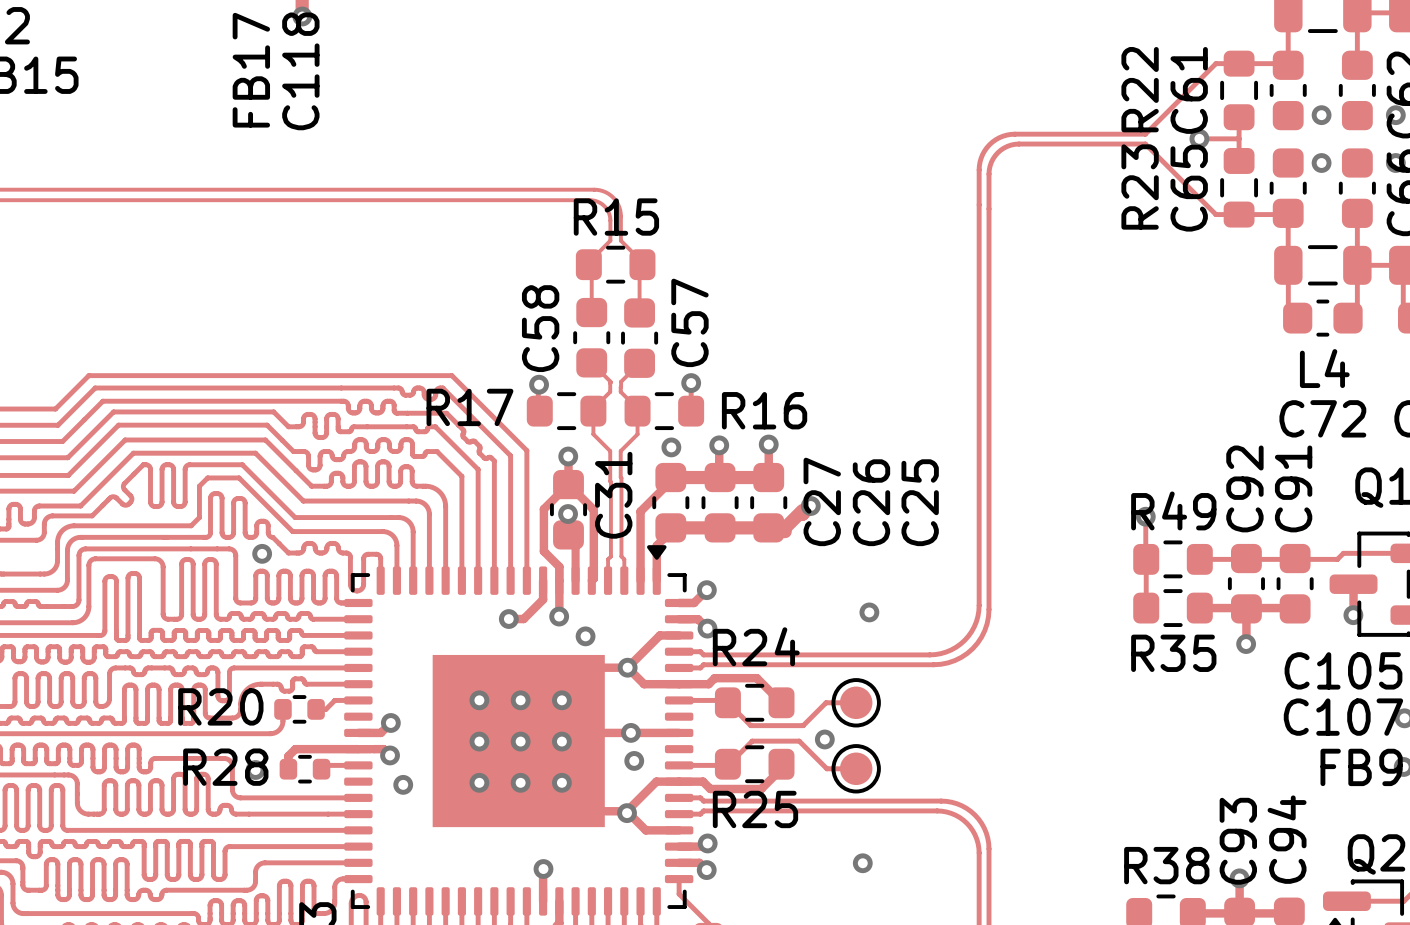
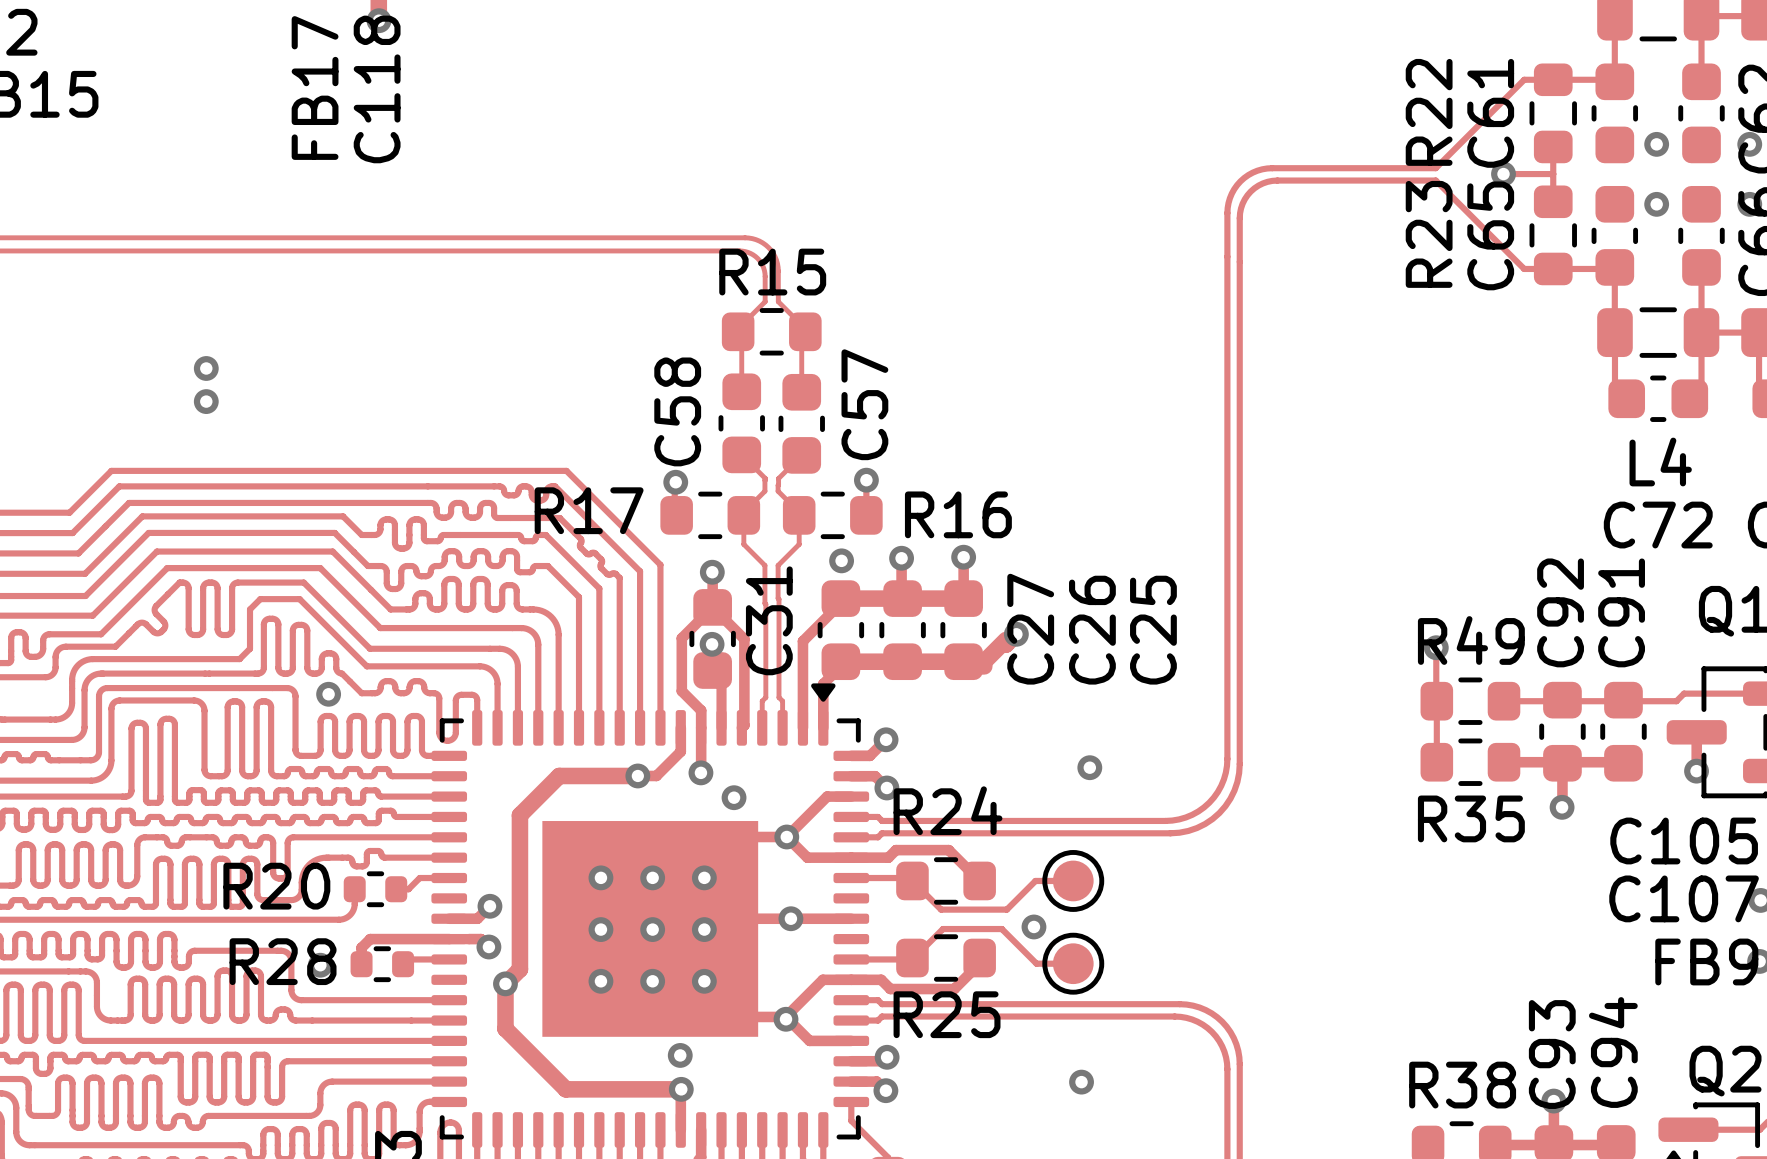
via: none -> (206, 368)
via: none -> (206, 401)
track: none -> (637, 775) (559, 775) (519, 815) (519, 969) (505, 983) (505, 1028) (565, 1089) (681, 1089)
via position: (634, 760) -> (680, 1055)

